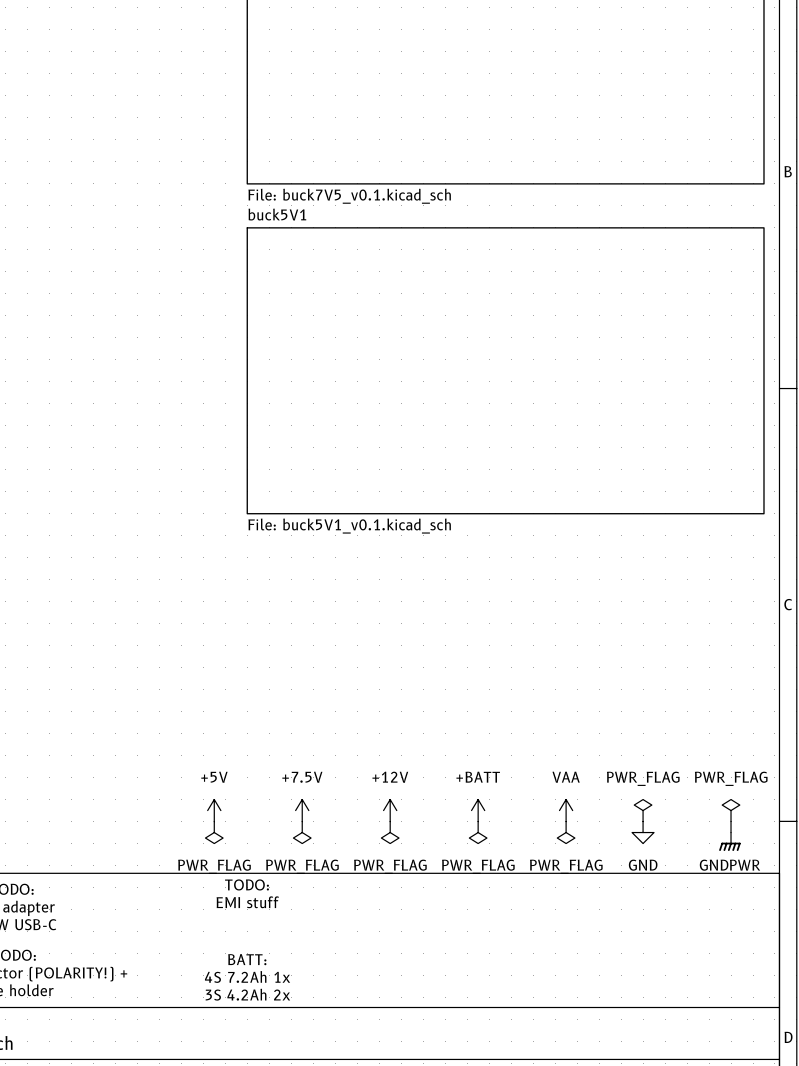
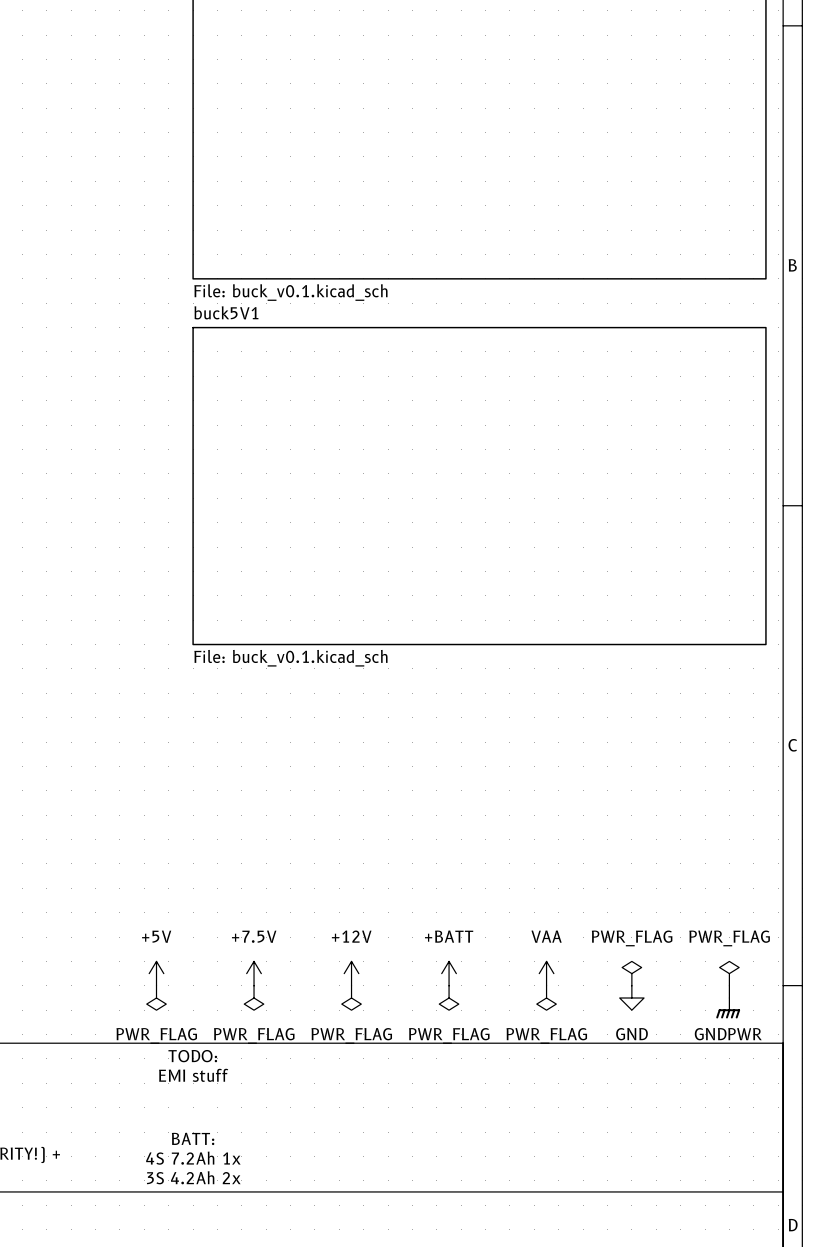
sheet value: File: buck7V5_v0.1.kicad_sch (349, 196) -> File: buck_v0.1.kicad_sch (290, 292)
sheet buck5V1 value: File: buck5V1_v0.1.kicad_sch (349, 526) -> File: buck_v0.1.kicad_sch (290, 658)

